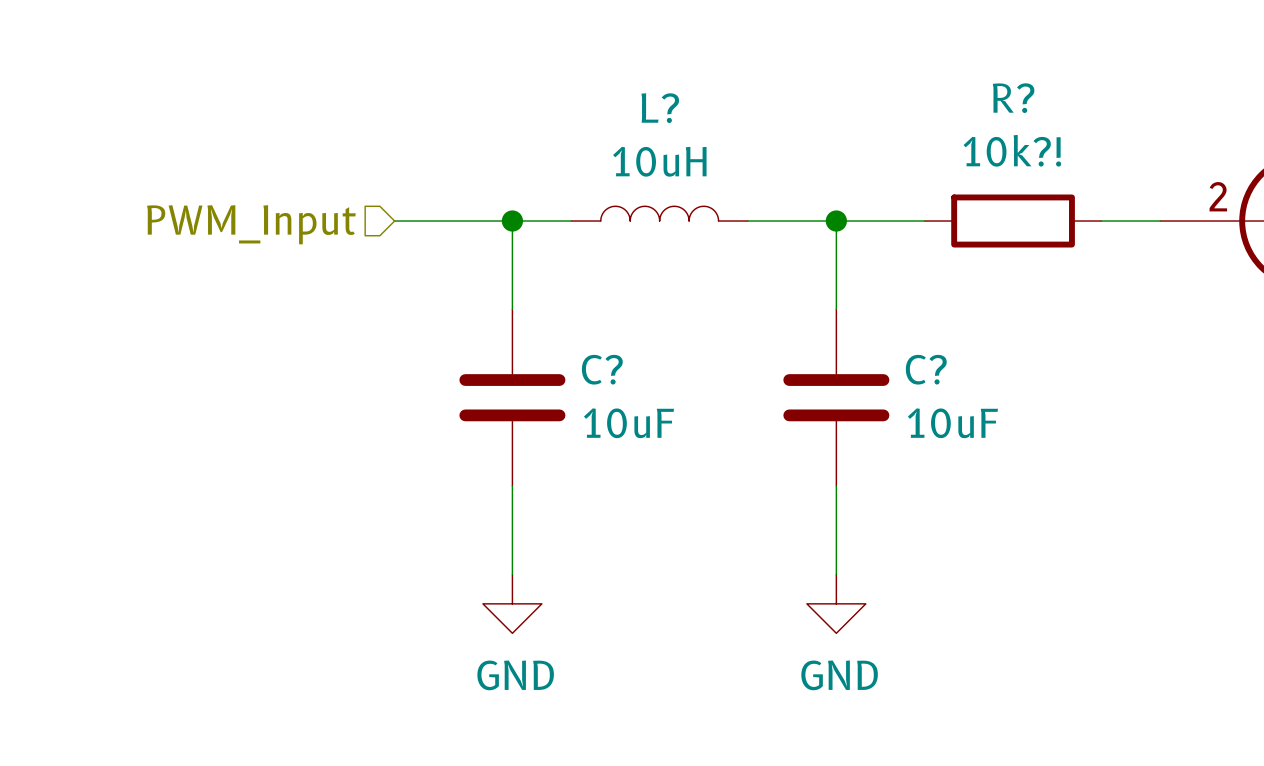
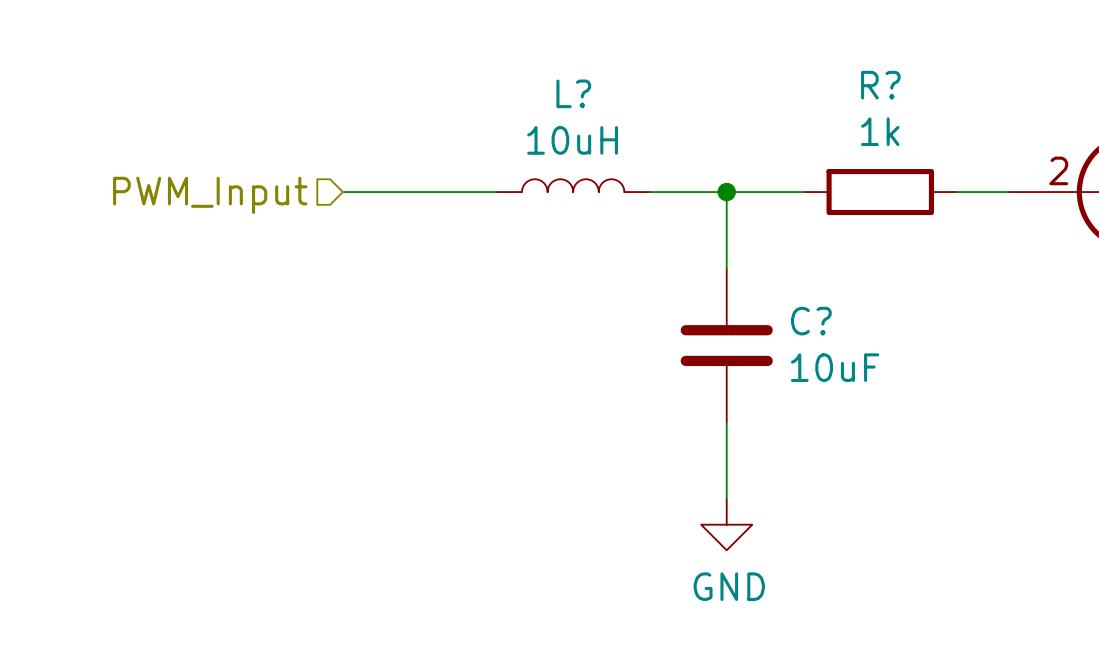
R? value: 10k?! (1012, 150) -> 1k (880, 131)
wire: (512, 221) (512, 309) -> none
junction: (512, 221) -> none
C?: 10uF (512, 397) -> none
wire: (512, 486) (512, 574) -> none
power symbol: GND (512, 603) -> none

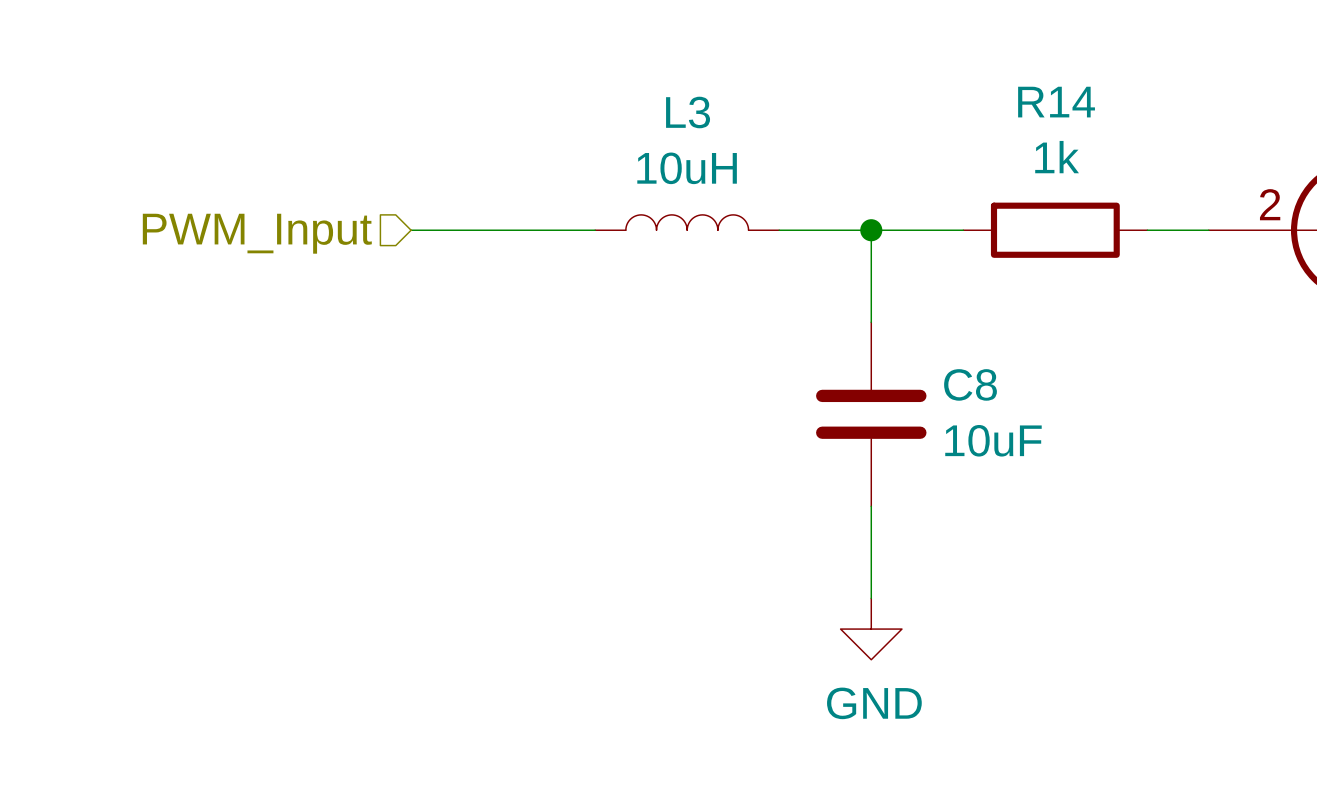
R? name: R? (880, 85) -> R14 (1056, 102)
L? name: L? (573, 93) -> L3 (688, 112)
C? name: C? (811, 321) -> C8 (970, 384)

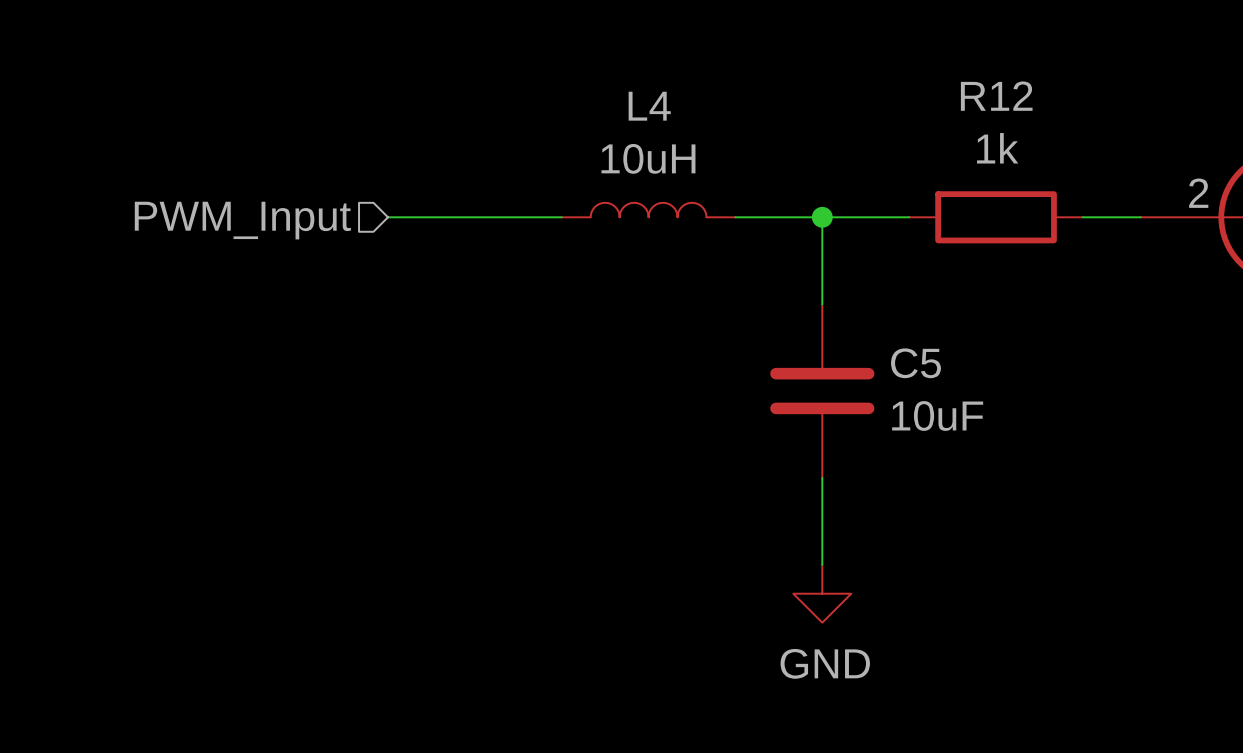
R14 name: R14 (1056, 102) -> R12 (996, 96)
L3 name: L3 (688, 112) -> L4 (649, 106)
C8 name: C8 (970, 384) -> C5 (916, 363)

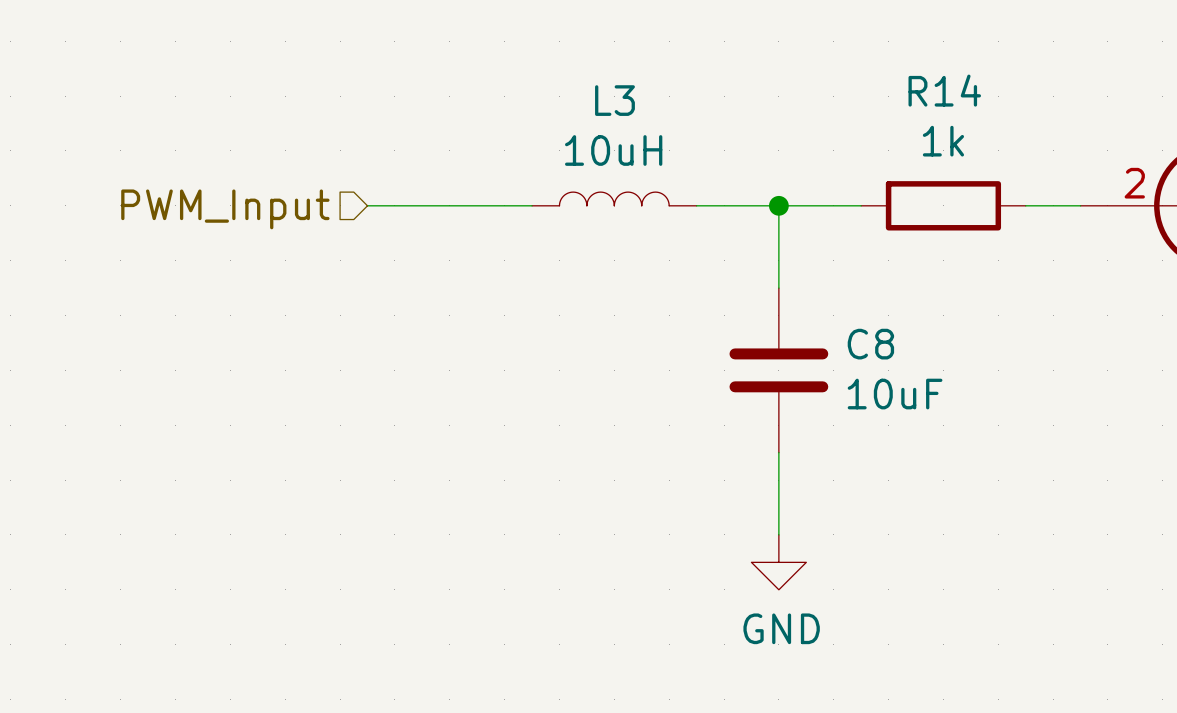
R12 name: R12 (996, 96) -> R14 (944, 90)
L4 name: L4 (649, 106) -> L3 (614, 100)
C5 name: C5 (916, 363) -> C8 (870, 344)

